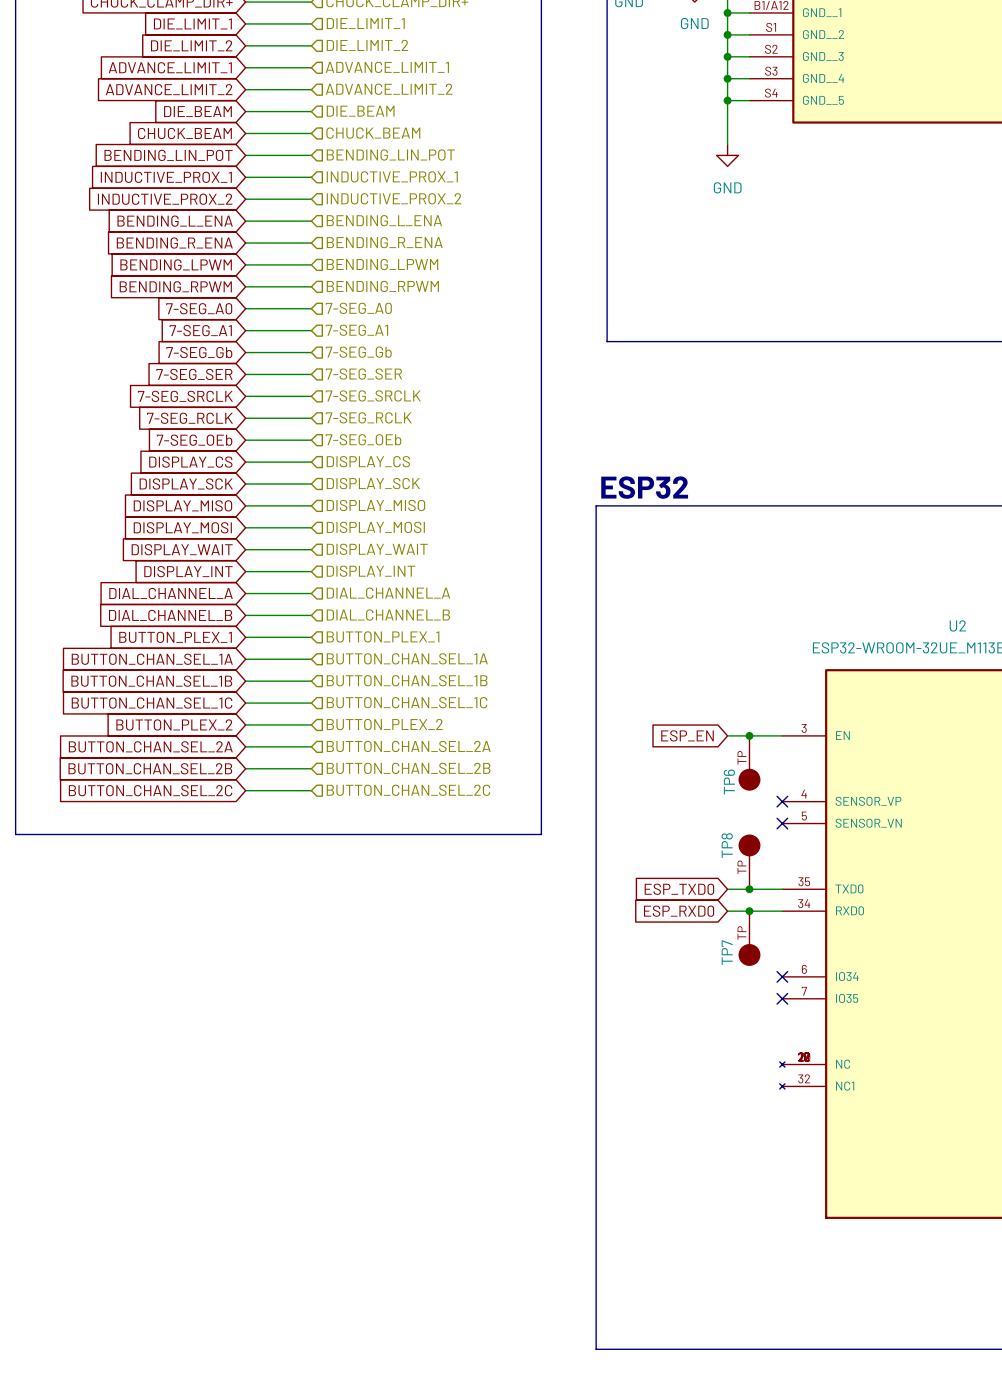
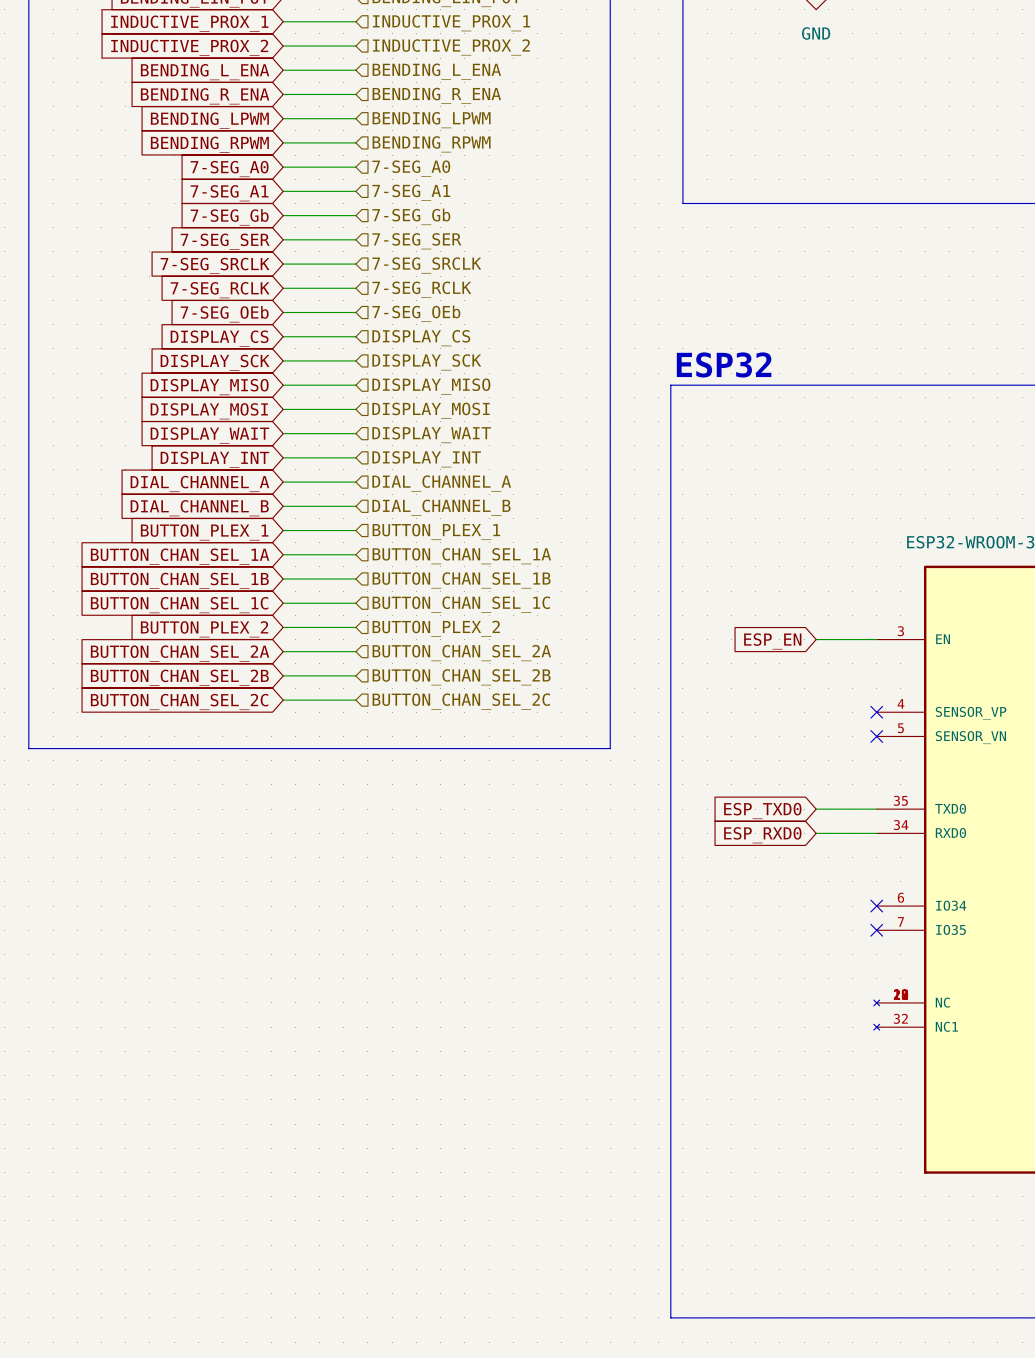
junction: (749, 735) -> none
TP6: (749, 763) -> none
TP8: (749, 861) -> none
junction: (749, 889) -> none
junction: (749, 911) -> none
TP7: (749, 938) -> none

